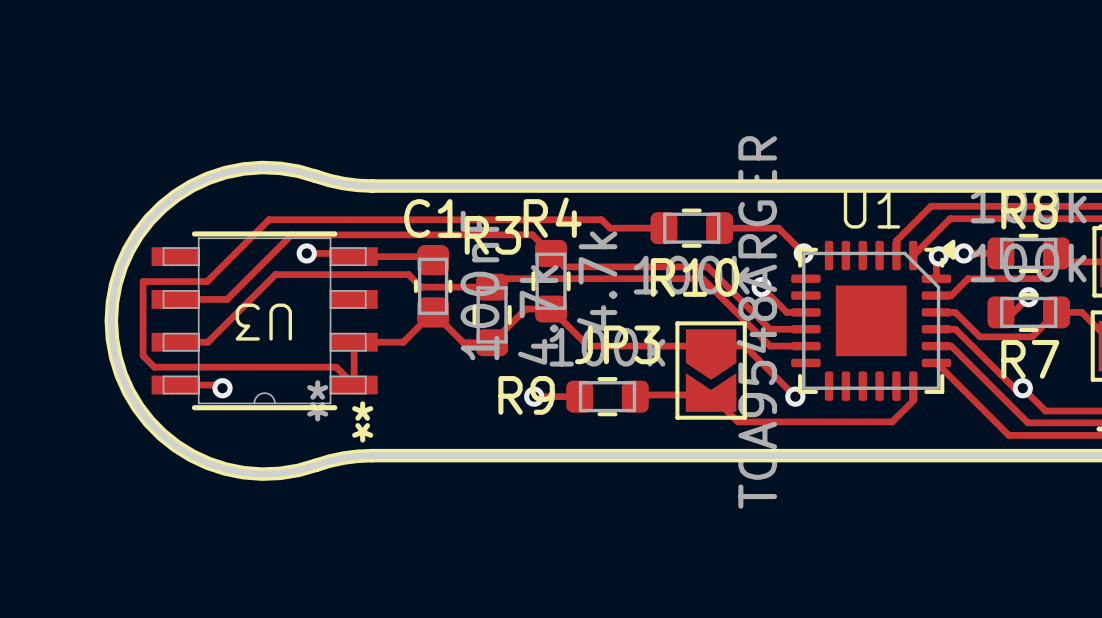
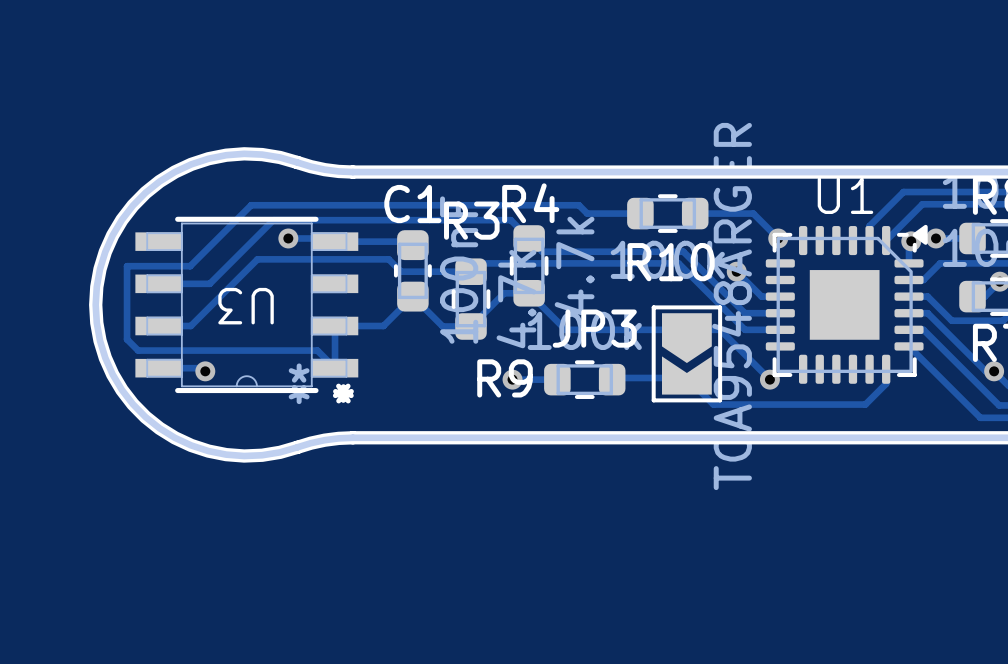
U3 footprint: [151, 231, 378, 411] -> [135, 216, 359, 394]

